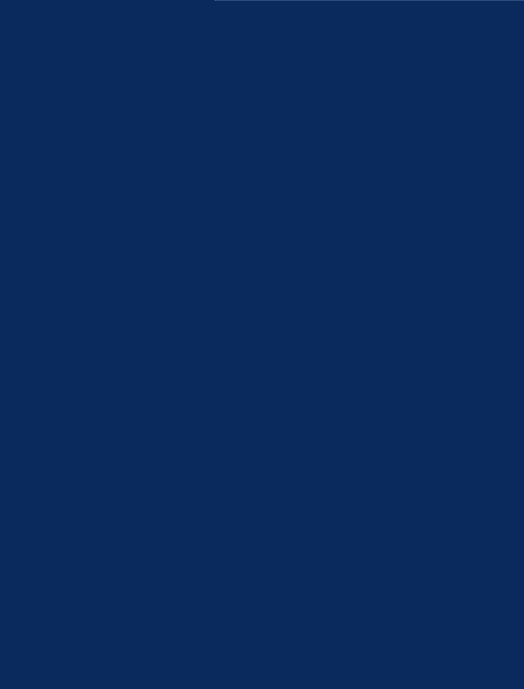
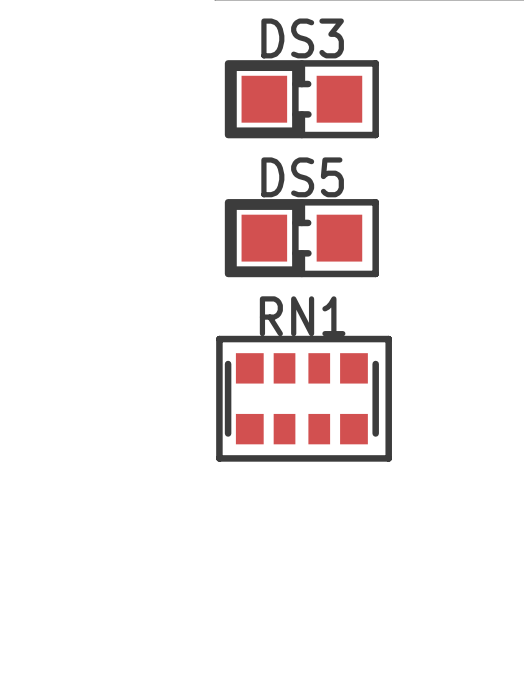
DS3: none -> (301, 99)
DS5: none -> (301, 238)
RN1: none -> (304, 398)

